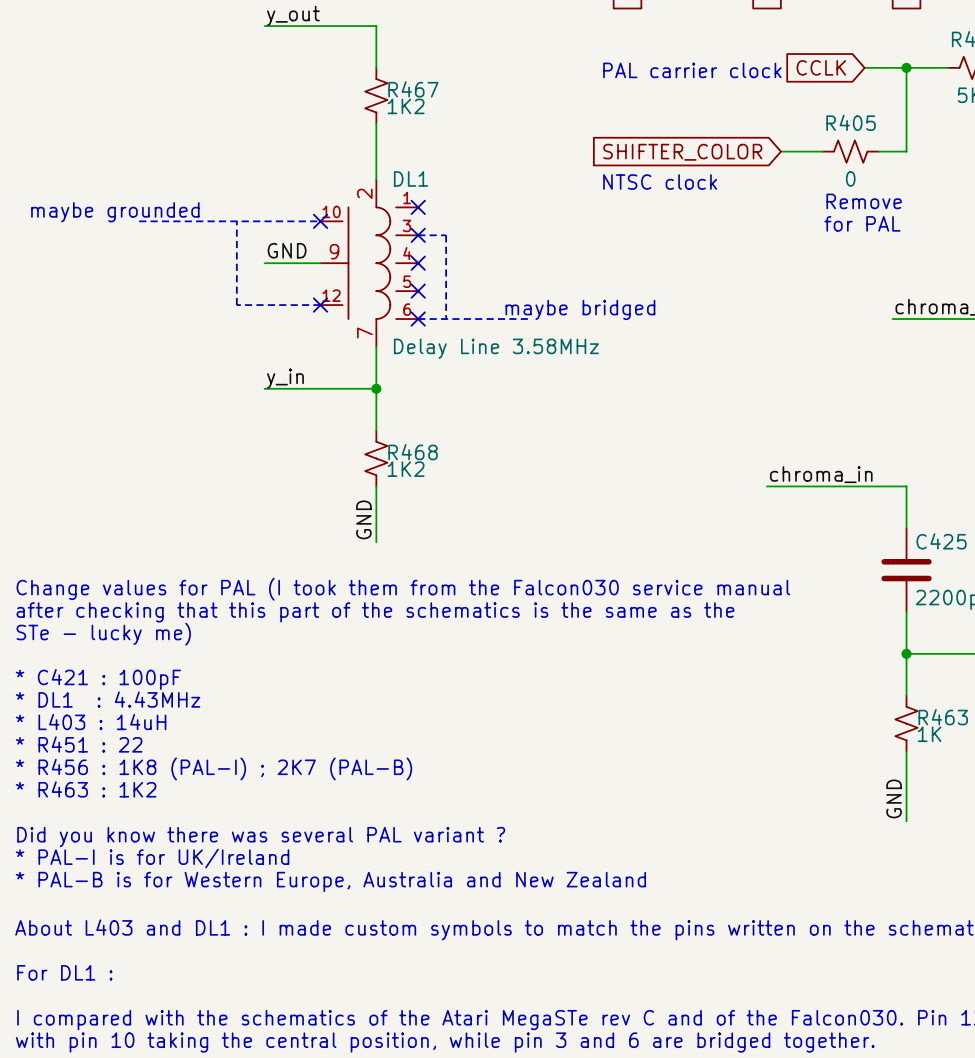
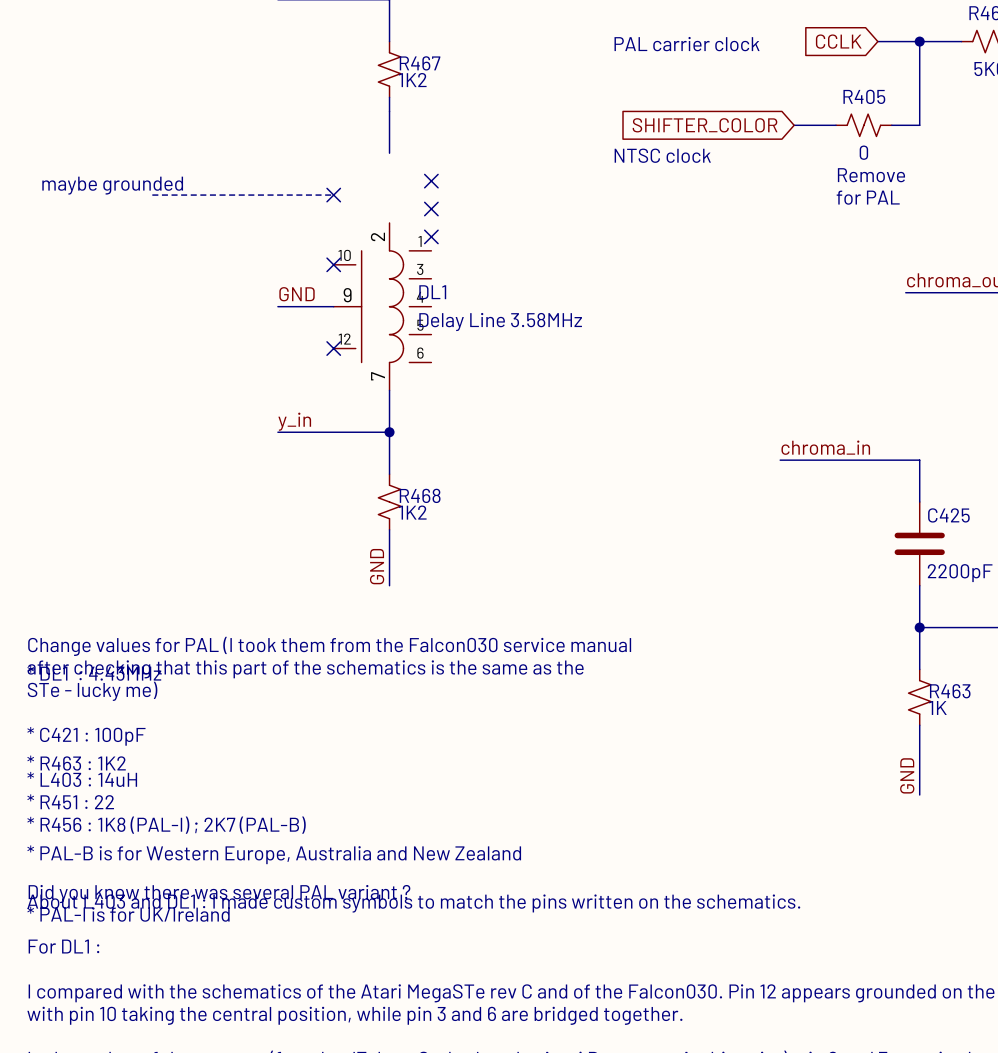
DL1 name position: DL1 (411, 178) -> DL1 (432, 292)
line: (236, 221) (236, 305) (320, 305) -> none
line: (418, 235) (446, 235) (446, 319) -> none
label position: GND (287, 250) -> GND (297, 294)
wire: (264, 263) (320, 263) -> (277, 306) (333, 306)
DL1 position: (369, 263) -> (382, 306)
no-connect mark: (418, 291) -> none
no-connect mark position: (320, 305) -> (333, 264)
text: maybe bridged (580, 309) -> none
line: (418, 319) (529, 319) -> none
no-connect mark: (418, 319) -> none
wire: (376, 346) (376, 416) -> none
DL1 value position: Delay Line 3.58MHz (496, 348) -> Delay Line 3.58MHz (500, 322)
no-connect mark: none -> (333, 348)
label position: y_in (285, 378) -> y_in (294, 421)
wire: (264, 388) (376, 388) -> (277, 432) (389, 432)
junction: (376, 388) -> none
R468 position: (376, 458) -> (389, 502)
junction: none -> (389, 432)
wire: (376, 500) (376, 542) -> none
label position: GND (363, 519) -> GND (377, 566)
wire: none -> (389, 529) (389, 585)
text position: Change values for PAL (I took them from the Falcon030 service manual (403, 589) -> Change values for PAL (I took them from the Falcon030 service manual (329, 646)
text position: after checking that this part of the schematics is the same as the (375, 612) -> after checking that this part of the schematics is the same as the (305, 669)
text position: STe - lucky me) (103, 634) -> STe - lucky me) (92, 691)
text position: * C421 : 100pF (98, 679) -> * C421 : 100pF (86, 736)
text position: * L403 : 14uH (91, 722) -> * L403 : 14uH (82, 779)
text position: * R451 : 22 (79, 744) -> * R451 : 22 (70, 801)
text position: * R456 : 1K8 (PAL-I) ; 2K7 (PAL-B) (214, 768) -> * R456 : 1K8 (PAL-I) ; 2K7 (PAL-B) (166, 825)
text position: Did you know there was several PAL variant ? (261, 837) -> Did you know there was several PAL variant ? (219, 894)
text position: * PAL-I is for UK/Ireland (152, 858) -> * PAL-I is for UK/Ireland (128, 914)

